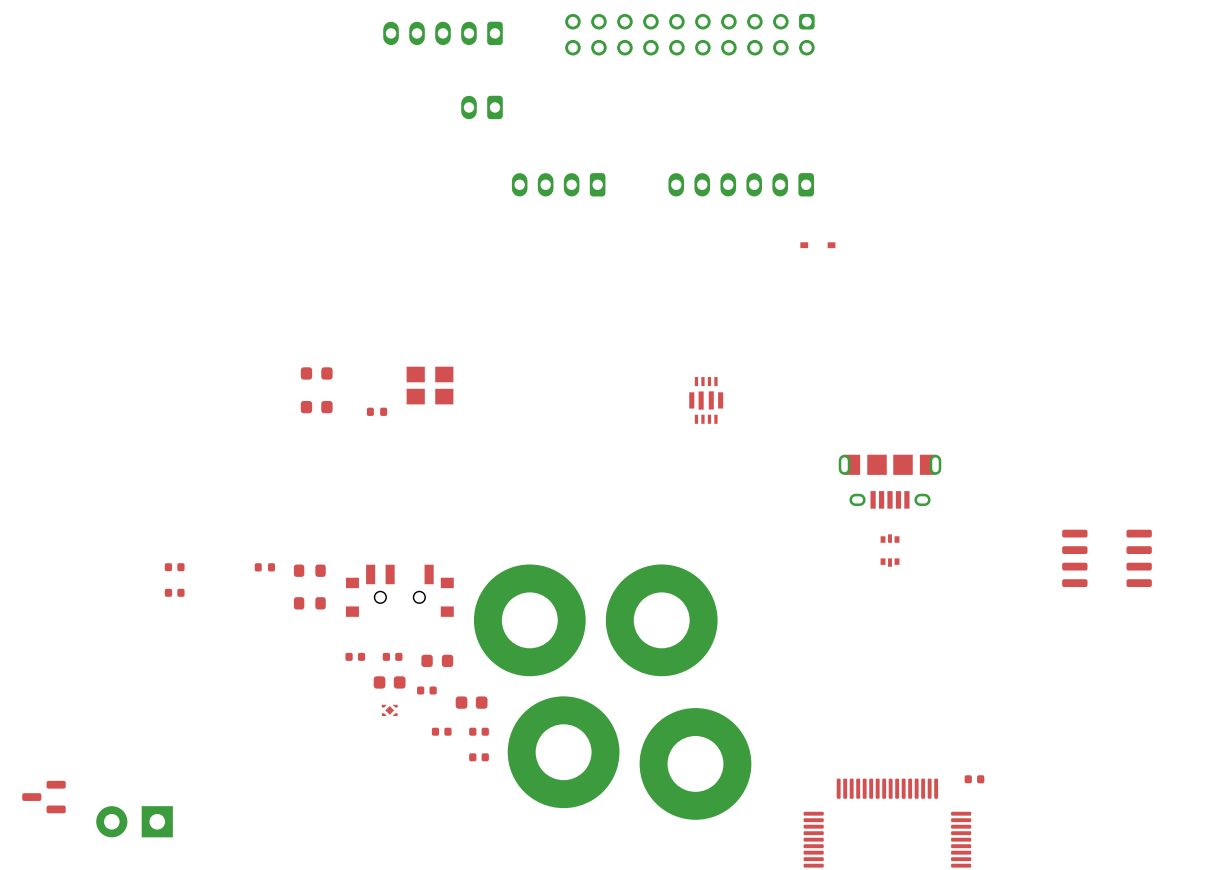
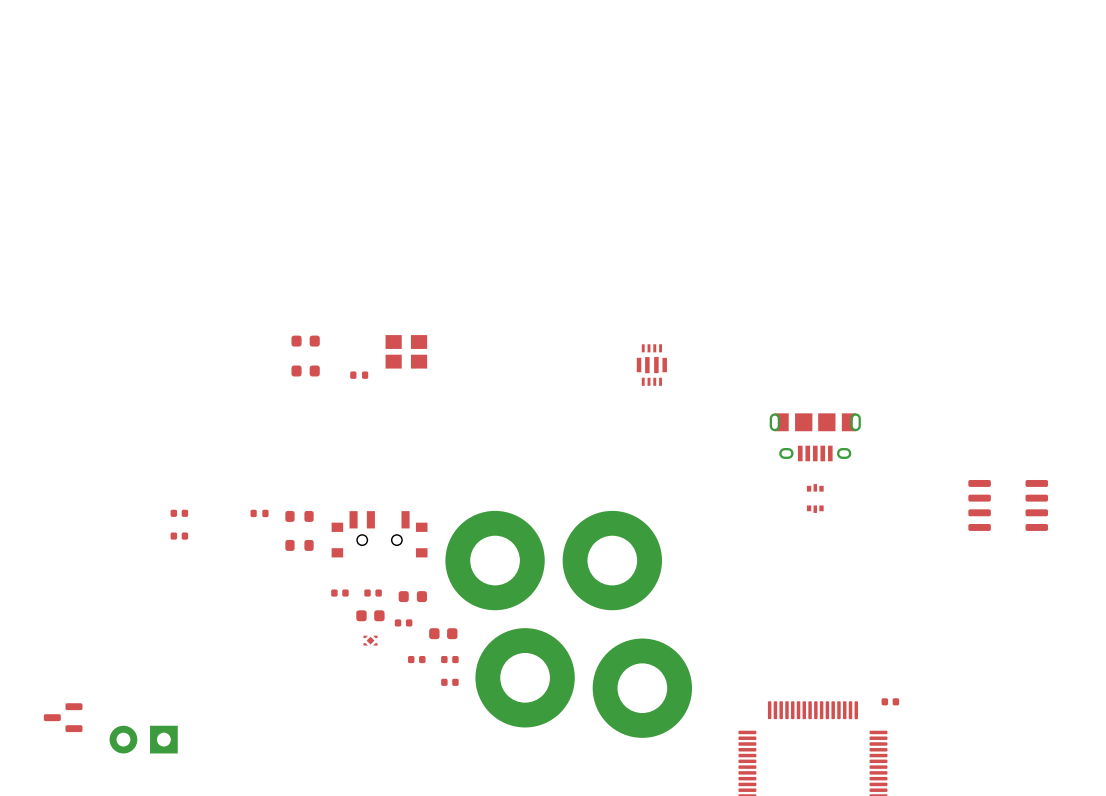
part: (443, 33) -> none
part: (689, 34) -> none
part: (481, 107) -> none
part: (558, 184) -> none
part: (741, 184) -> none
part: (817, 245) -> none

